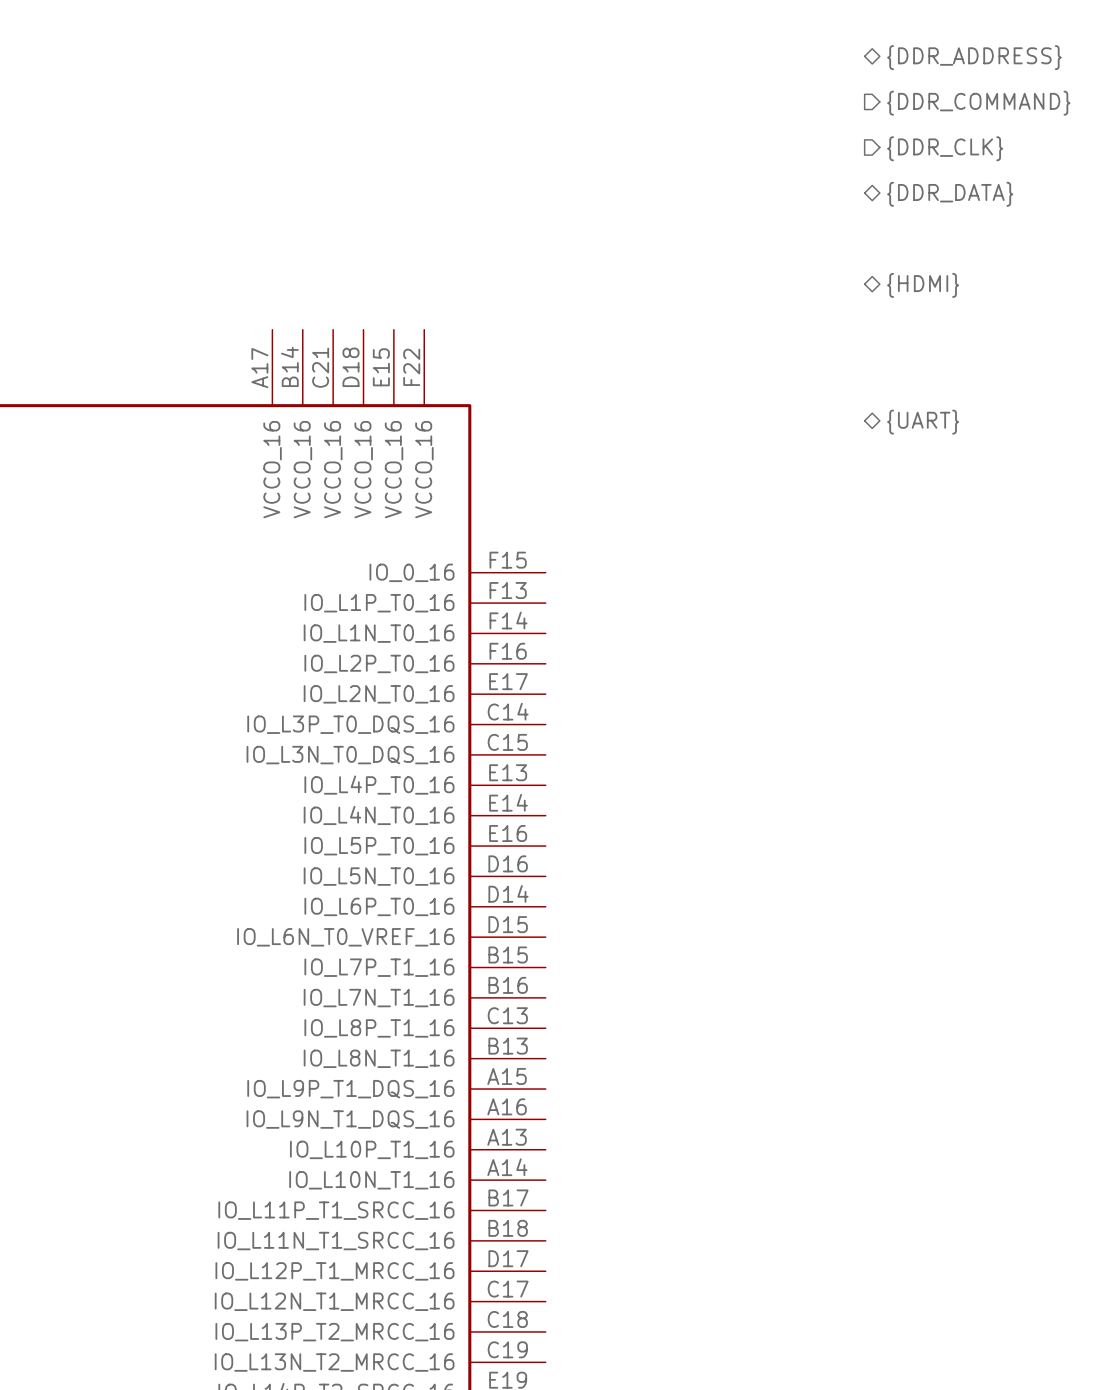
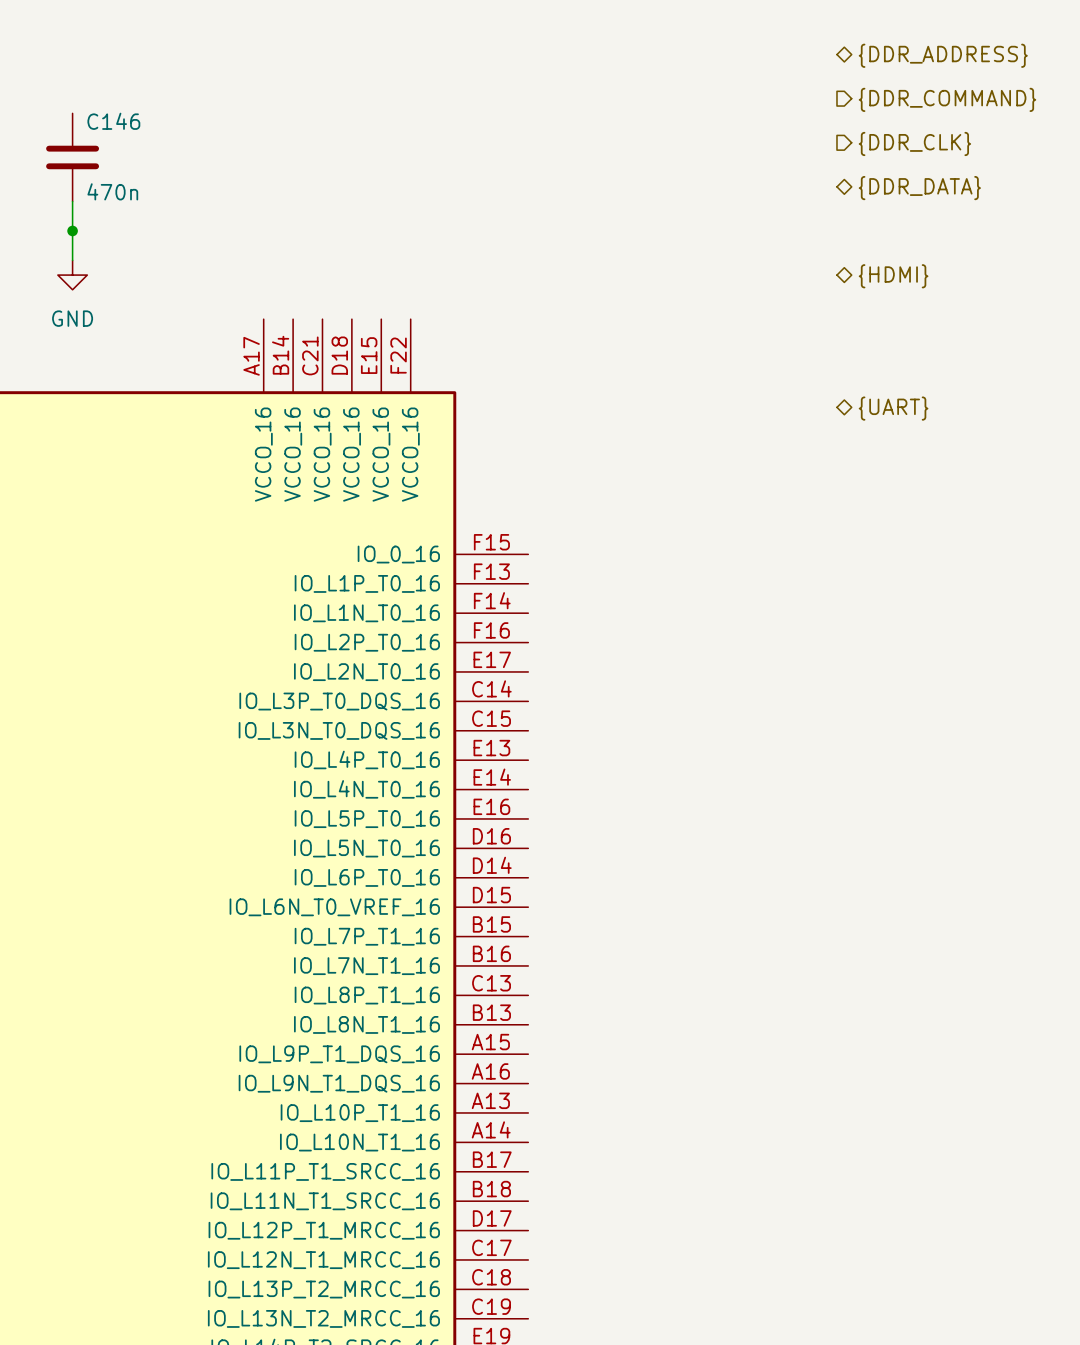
C146: none -> 470n (72, 157)
wire: none -> (72, 201) (72, 260)
junction: none -> (72, 230)
power symbol: none -> GND (72, 275)

